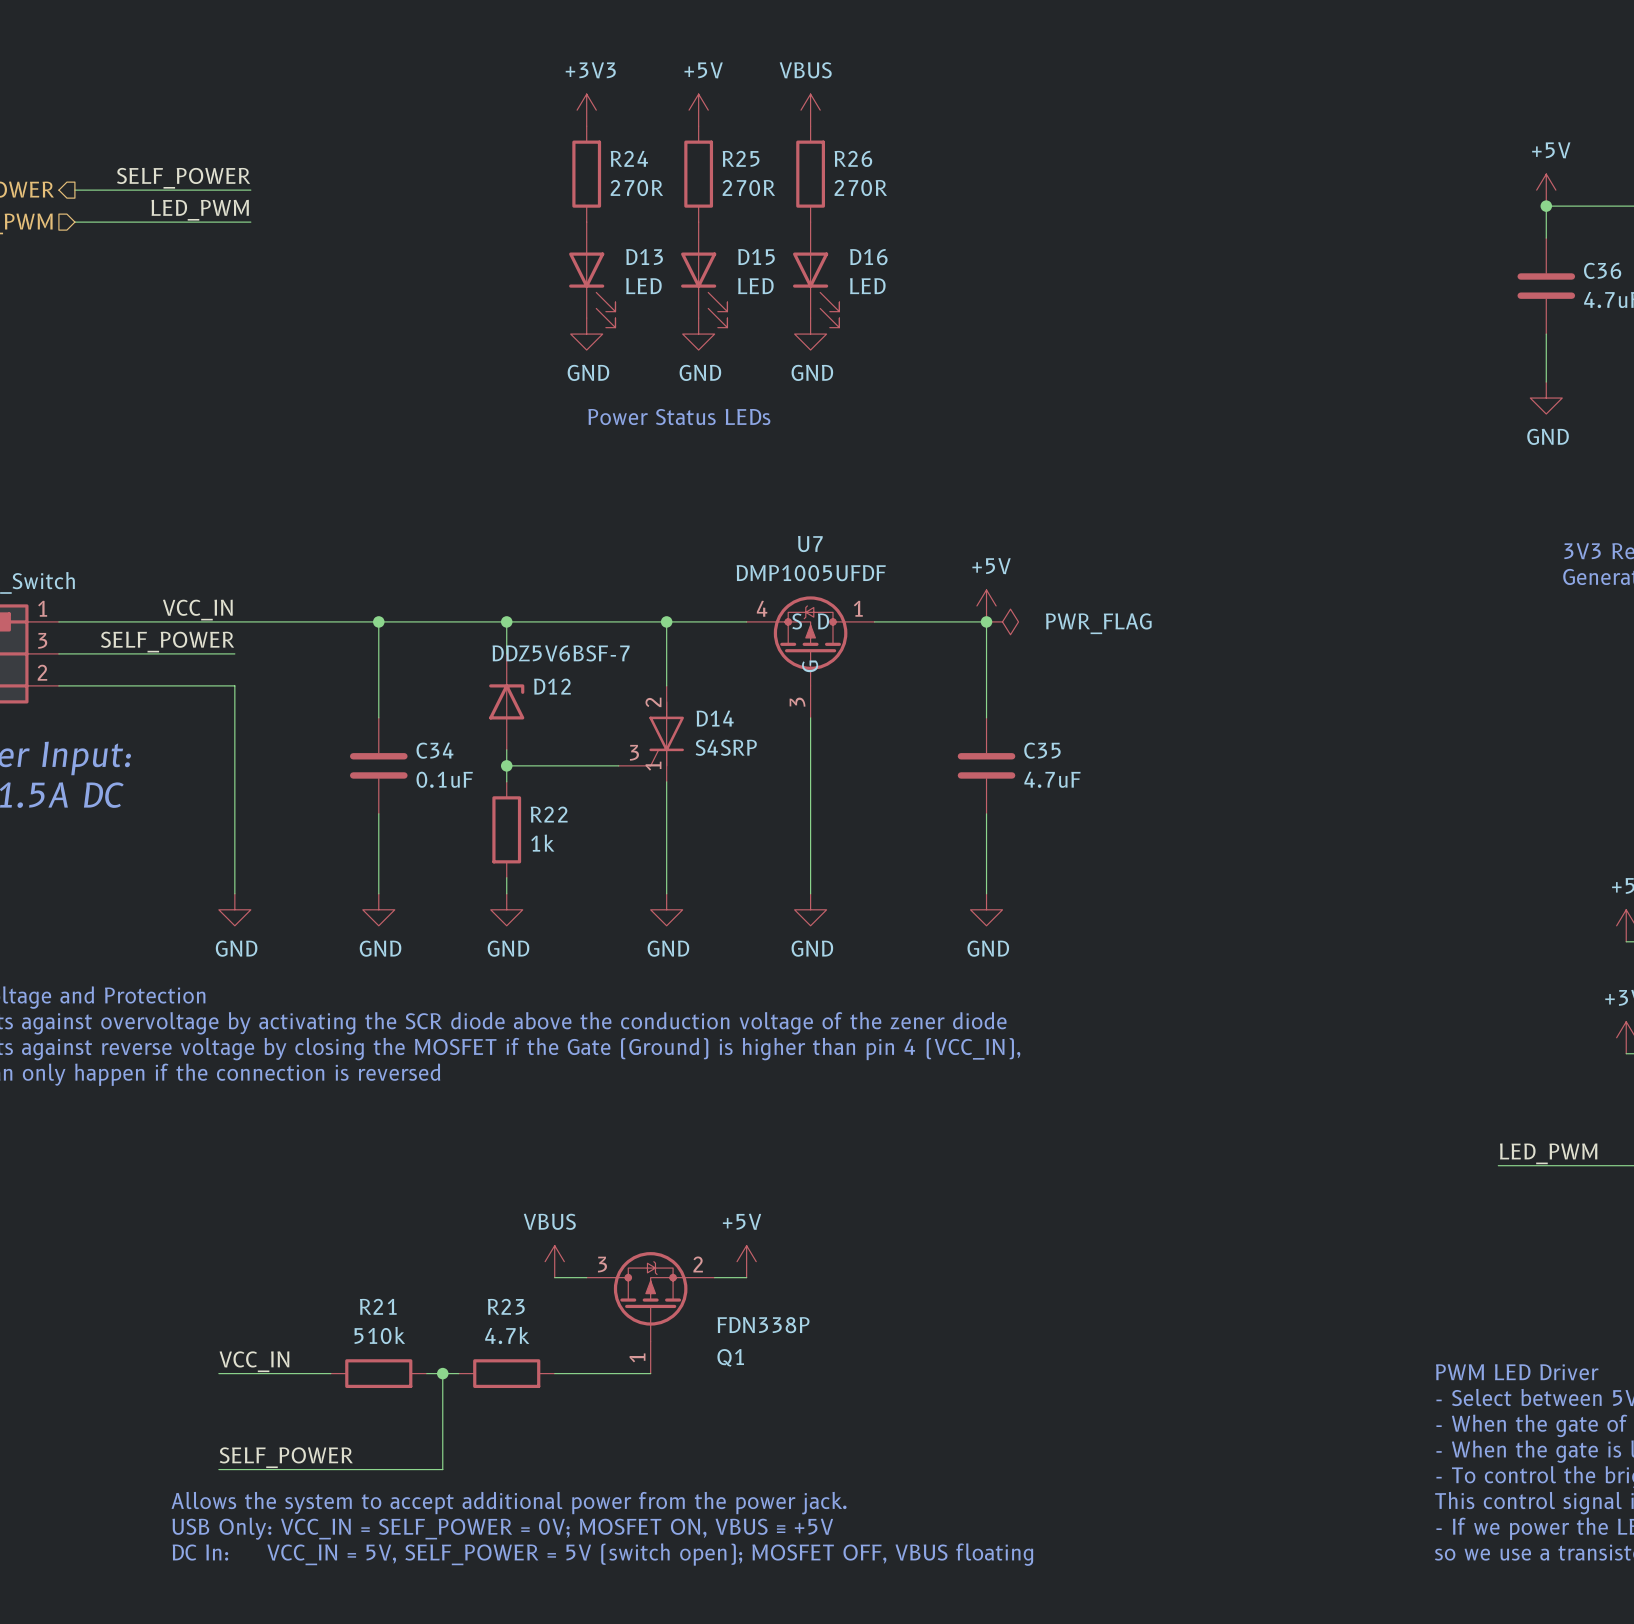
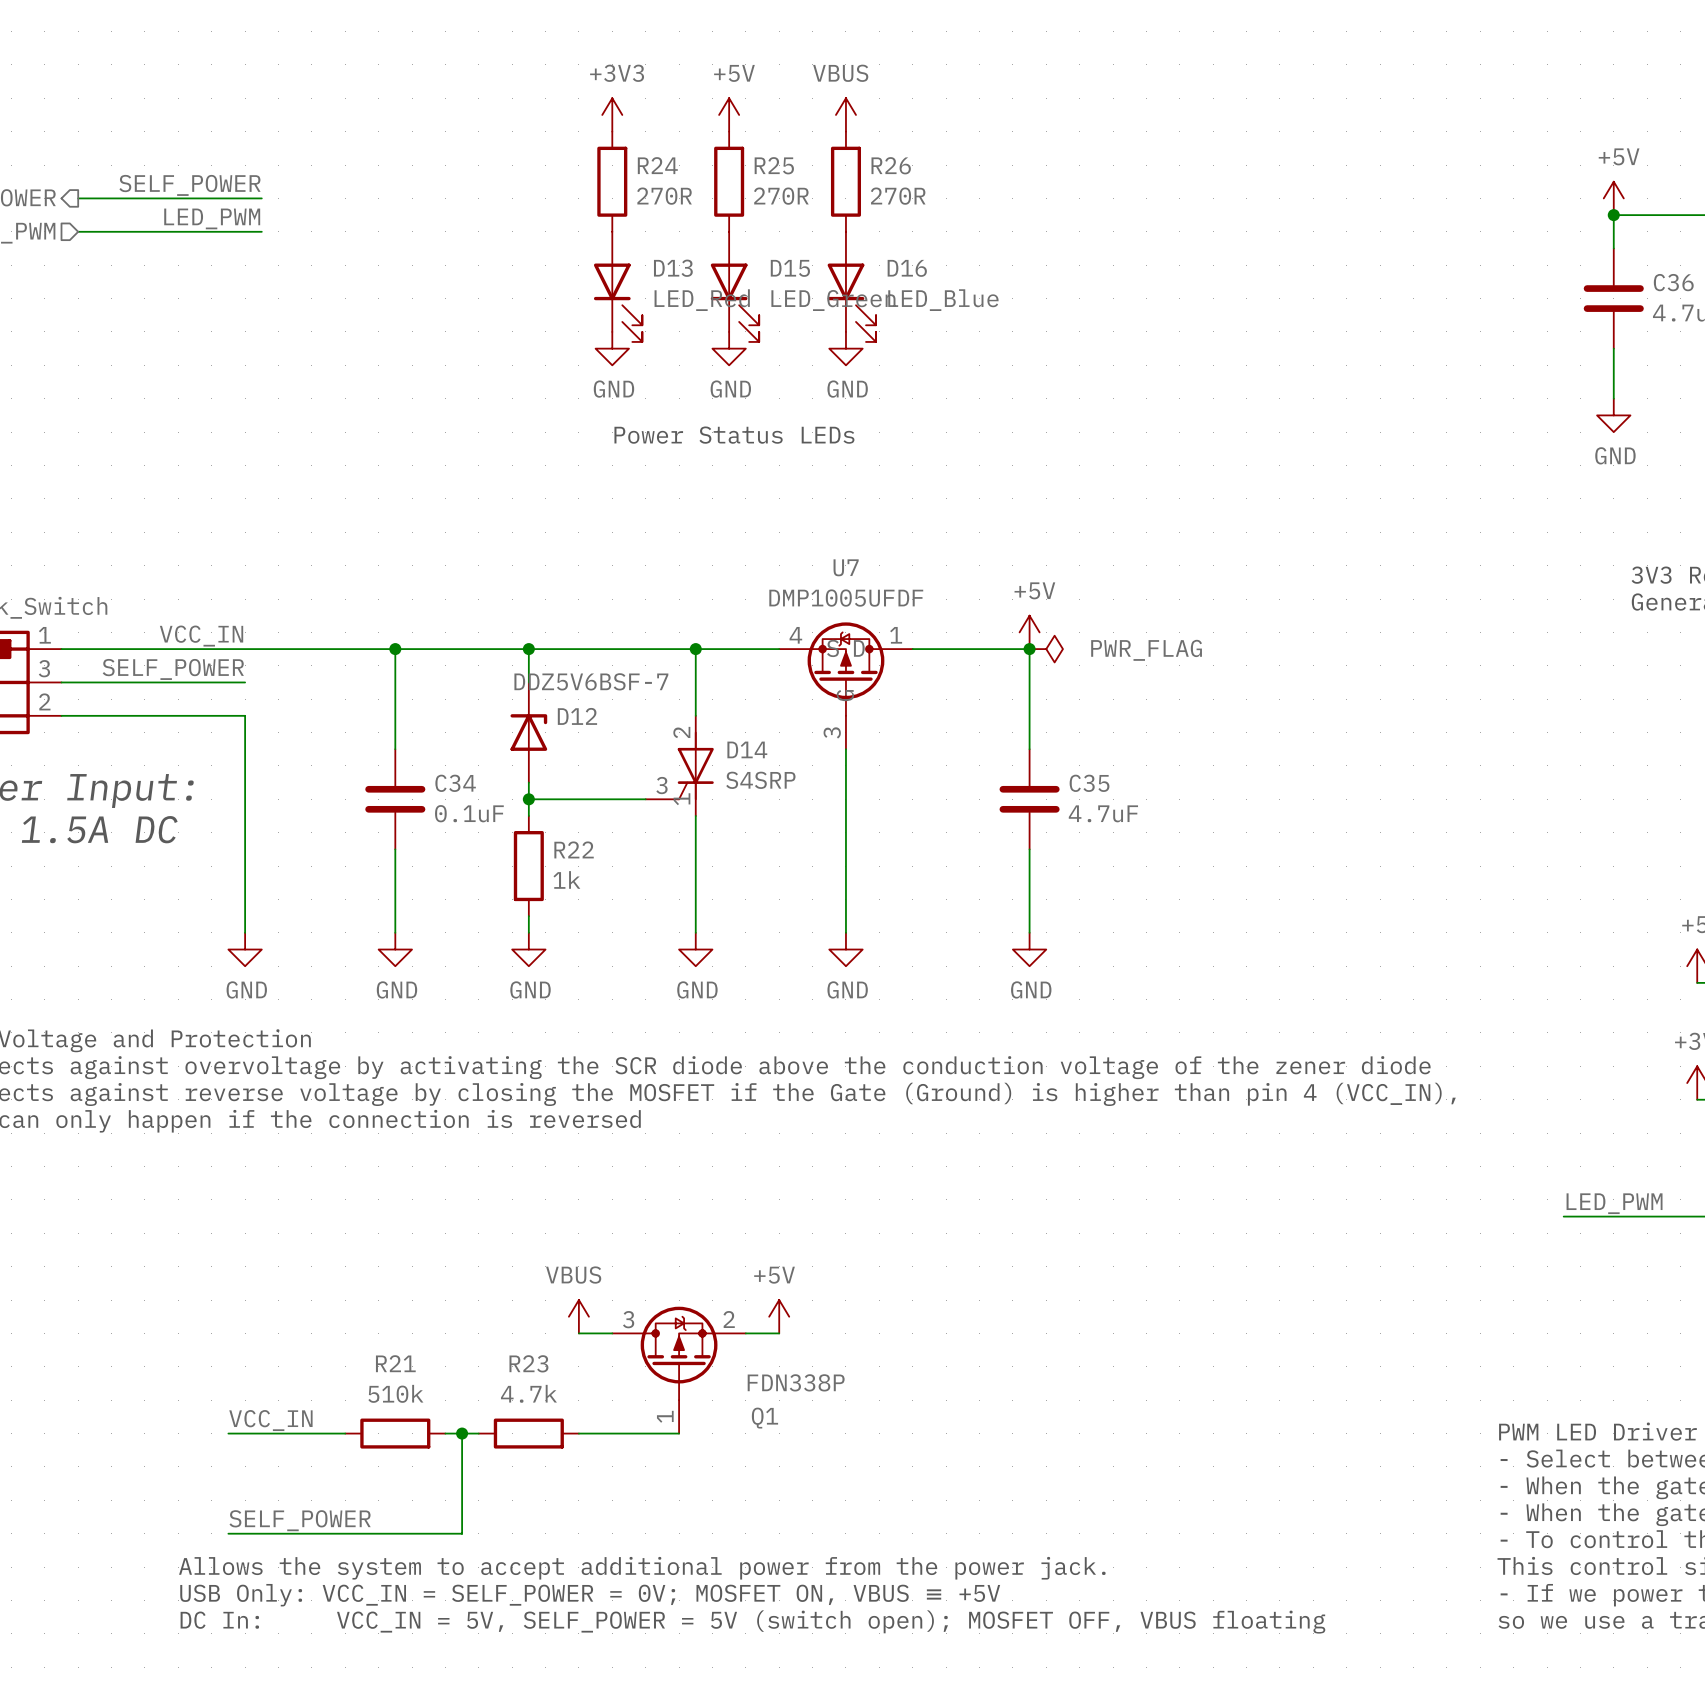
D13 value: LED (643, 286) -> LED_Red (702, 300)
D15 value: LED (755, 286) -> LED_Green (833, 300)
D16 value: LED (867, 286) -> LED_Blue (943, 300)

